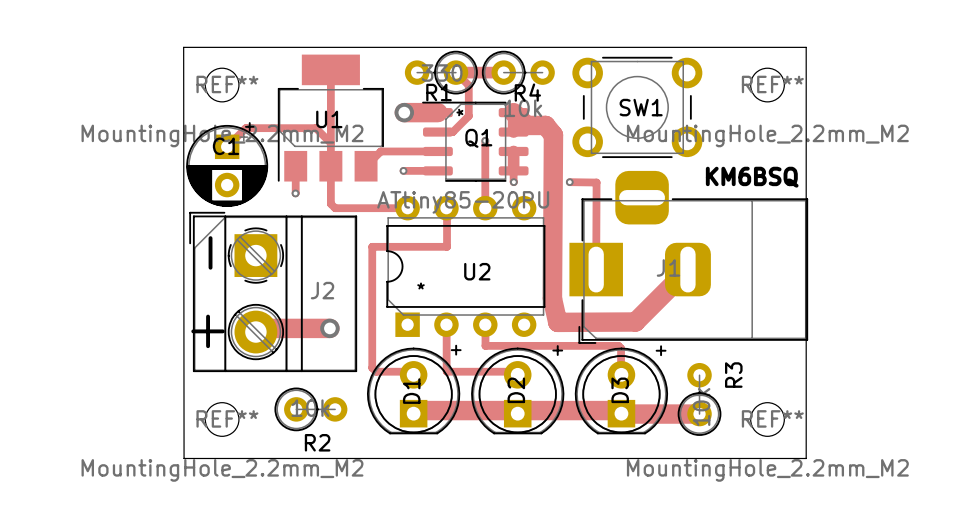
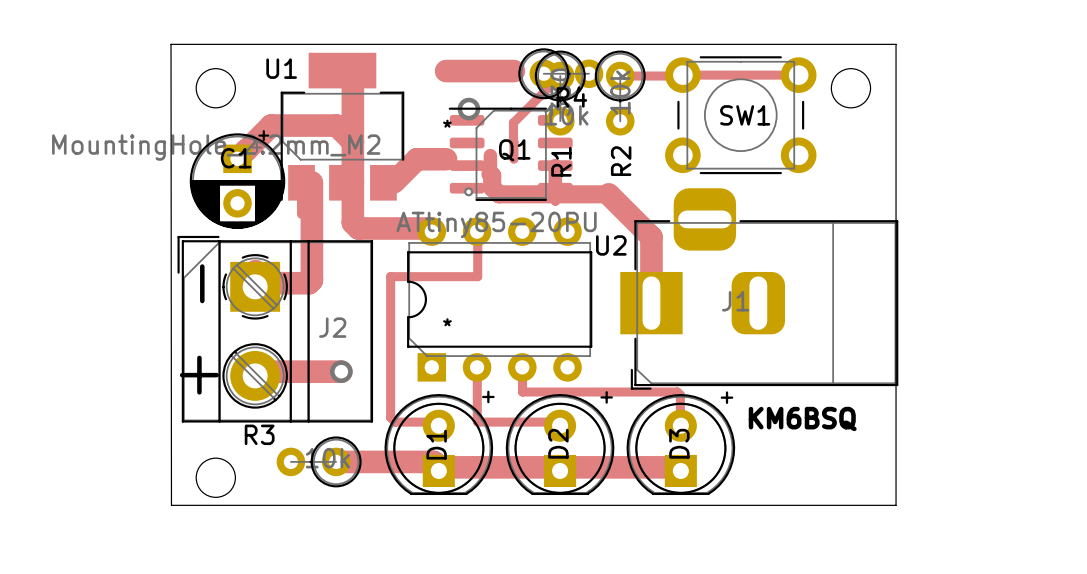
track: (330, 69) (330, 203) (335, 208) (407, 208) -> none
track: none -> (352, 70) (352, 222) (358, 228) (432, 228)
track: none -> (446, 71) (513, 71)
R1 rotation: 0° (441, 72) -> 90° counterclockwise (560, 93)
R1 position: (441, 72) -> (560, 93)
track: (503, 72) (455, 72) (468, 85) (468, 116) (452, 132) (437, 132) -> none
track: none -> (798, 75) (620, 76)
track: none -> (560, 76) (513, 122) (513, 159)
REF** name: REF** (227, 84) -> none
REF** name: REF** (772, 84) -> none
R1 name position: R1 (439, 92) -> R1 (561, 161)
SW1 position: (637, 107) -> (740, 115)
track: (404, 112) (437, 112) -> none
via position: (404, 112) -> (468, 109)
text rotation: 0° (459, 112) -> 90° clockwise (447, 123)
text position: * (459, 112) -> * (447, 123)
U1 name position: U1 (329, 119) -> U1 (281, 68)
track: none -> (352, 141) (336, 125) (271, 125) (237, 158)
track: (513, 132) (513, 112) (526, 125) (545, 125) (553, 135) (552, 298) (557, 322) (635, 322) (687, 269) -> none
REF** value: MountingHole_2.2mm_M2 (767, 135) -> none
track: (485, 140) (485, 208) -> none
via: (485, 140) -> none
track: none -> (490, 155) (492, 187) (499, 194) (608, 194) (651, 237) (651, 303)
track: (330, 143) (315, 128) (245, 128) (227, 146) -> none
track: none -> (446, 159) (416, 159) (393, 182)
track: (437, 151) (380, 151) (366, 166) -> none
C1 position: (227, 164) -> (237, 179)
track: none -> (311, 182) (311, 280) (308, 283) (255, 283) (255, 271)
track: (403, 170) (437, 170) -> none
via: (403, 170) -> none
via: none -> (468, 191)
text position: KM6BSQ (752, 177) -> KM6BSQ (802, 418)
via: (513, 182) -> none
track: (569, 182) (596, 182) (596, 269) (589, 263) -> none
via: (569, 182) -> none
via: (295, 193) -> none
U2 name position: U2 (477, 271) -> U2 (611, 245)
R3 rotation: 0° (699, 399) -> 90° counterclockwise (319, 461)
R3 position: (699, 399) -> (319, 461)
track: none -> (336, 461) (433, 461) (439, 467)
R2 rotation: 0° (310, 409) -> 90° clockwise (620, 93)
R2 position: (310, 409) -> (620, 93)
track: (621, 413) (699, 414) -> none
REF** name: REF** (227, 418) -> none
REF**: MountingHole_2.2mm_M2 (767, 419) -> none
board edge: (184, 443) (184, 458) (806, 458) (806, 443) -> (171, 505) (896, 505)
REF** value: MountingHole_2.2mm_M2 (222, 470) -> none

